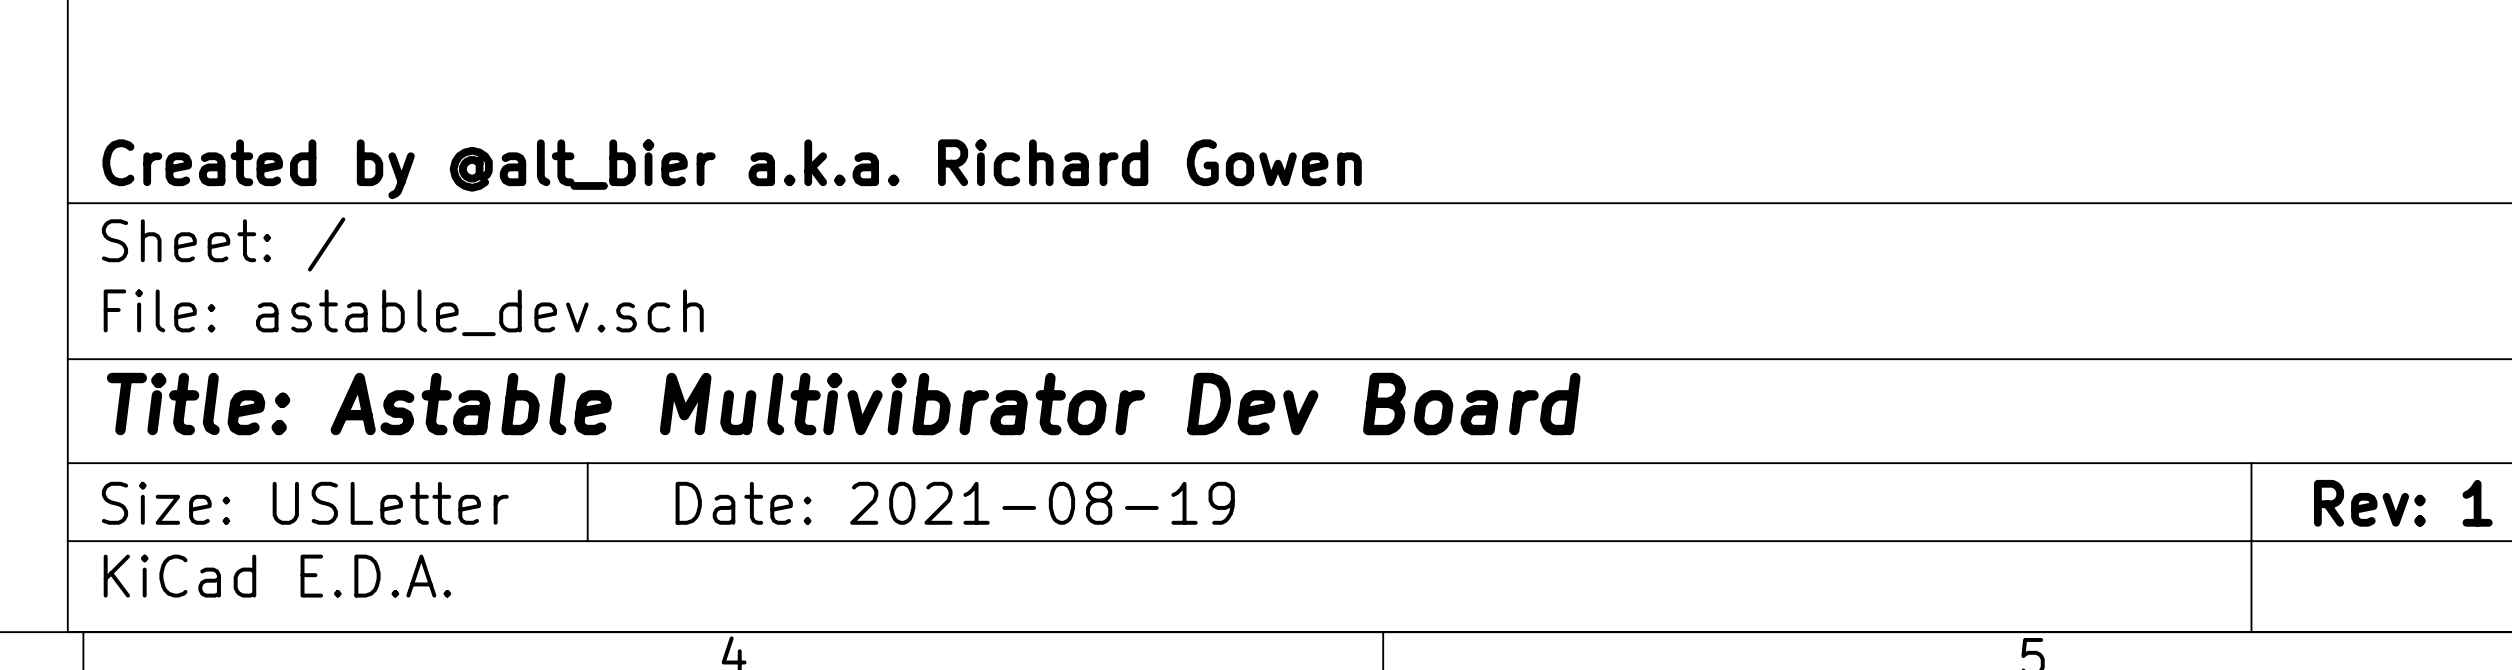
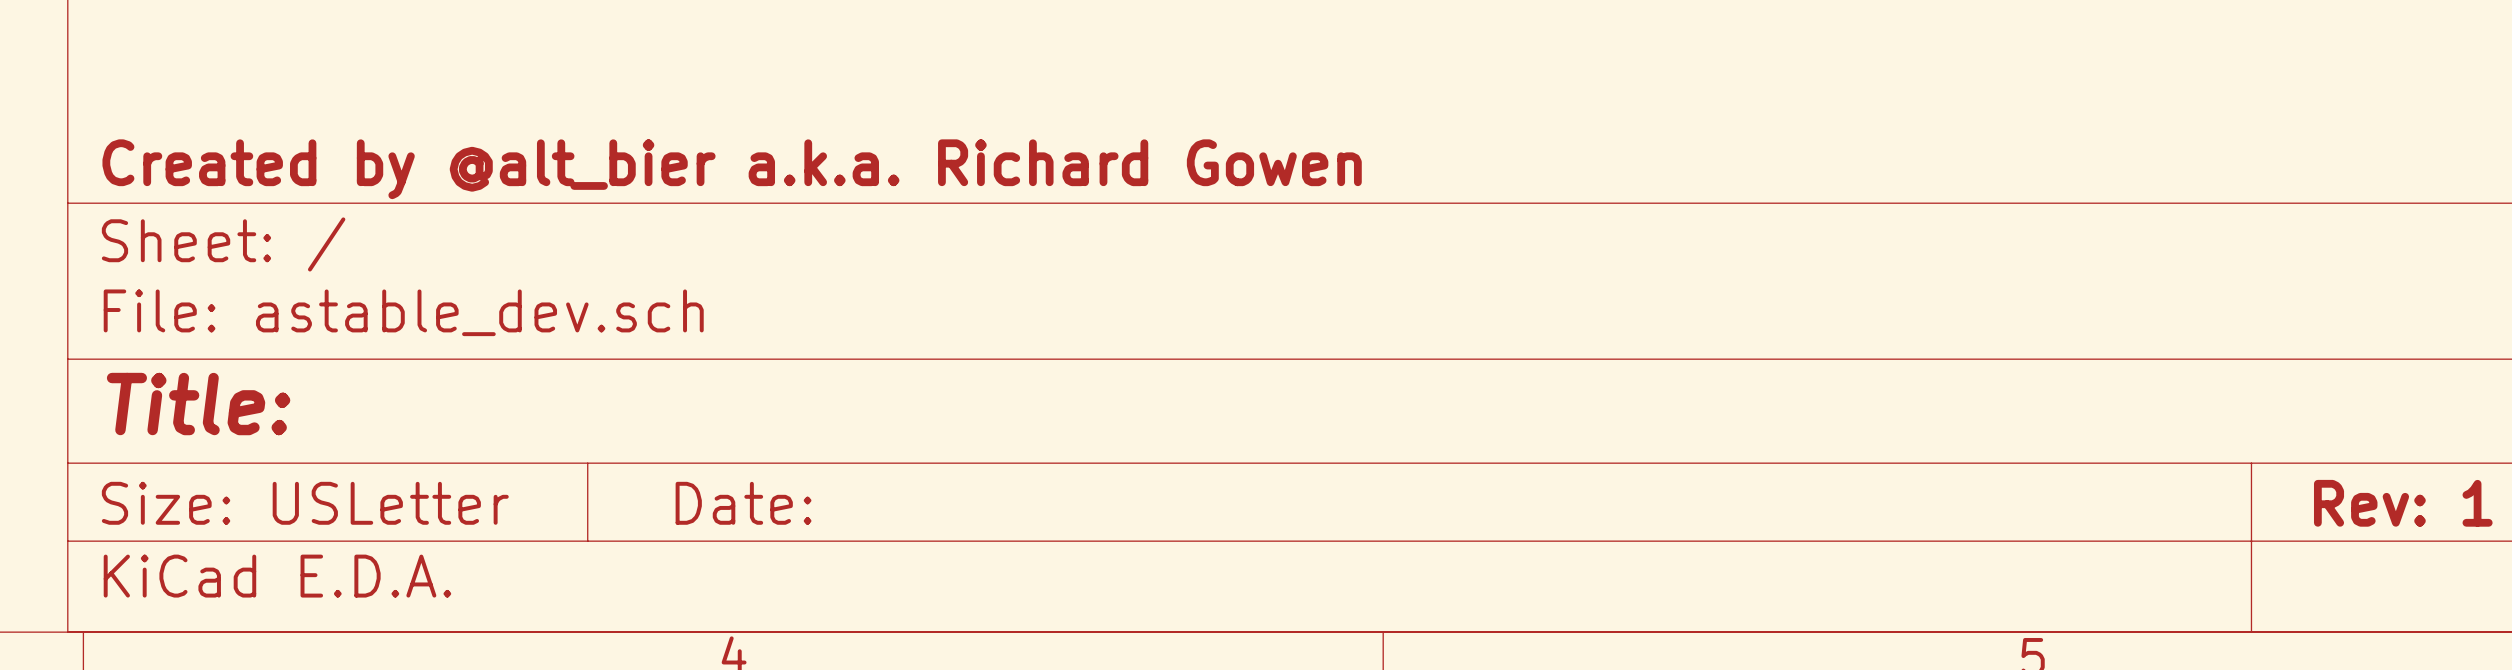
title block: Title: Astable Multivibrator Dev Board (843, 404) -> Title: (198, 404)
title block: Date: 2021-08-19 (955, 503) -> Date: (743, 503)

